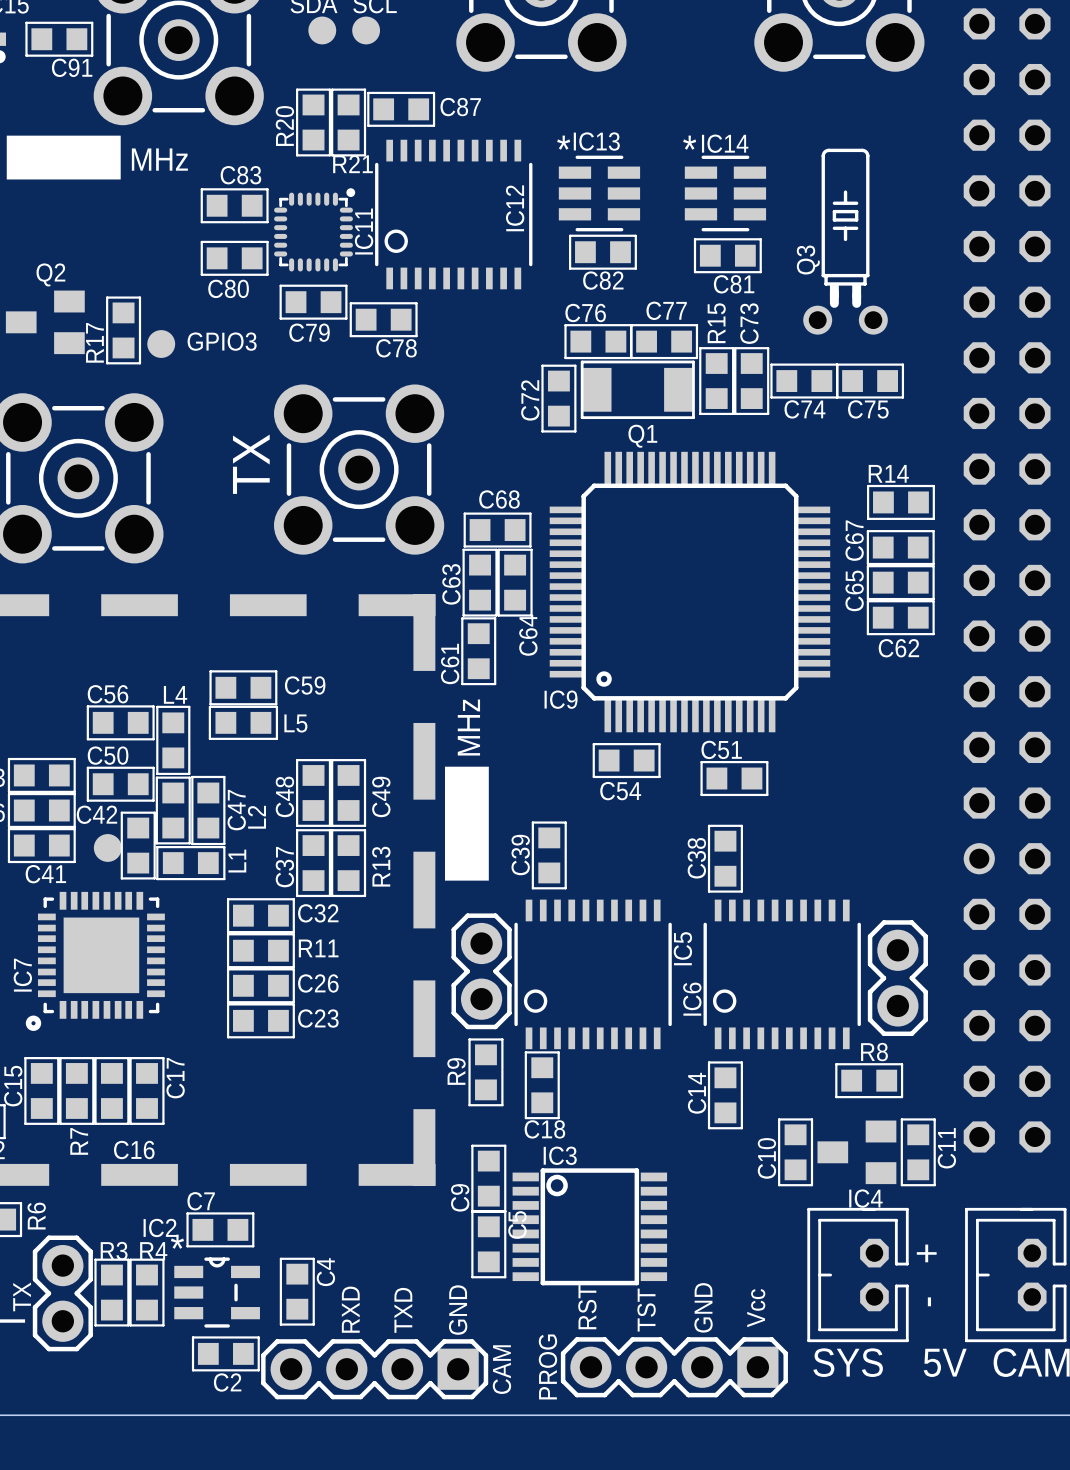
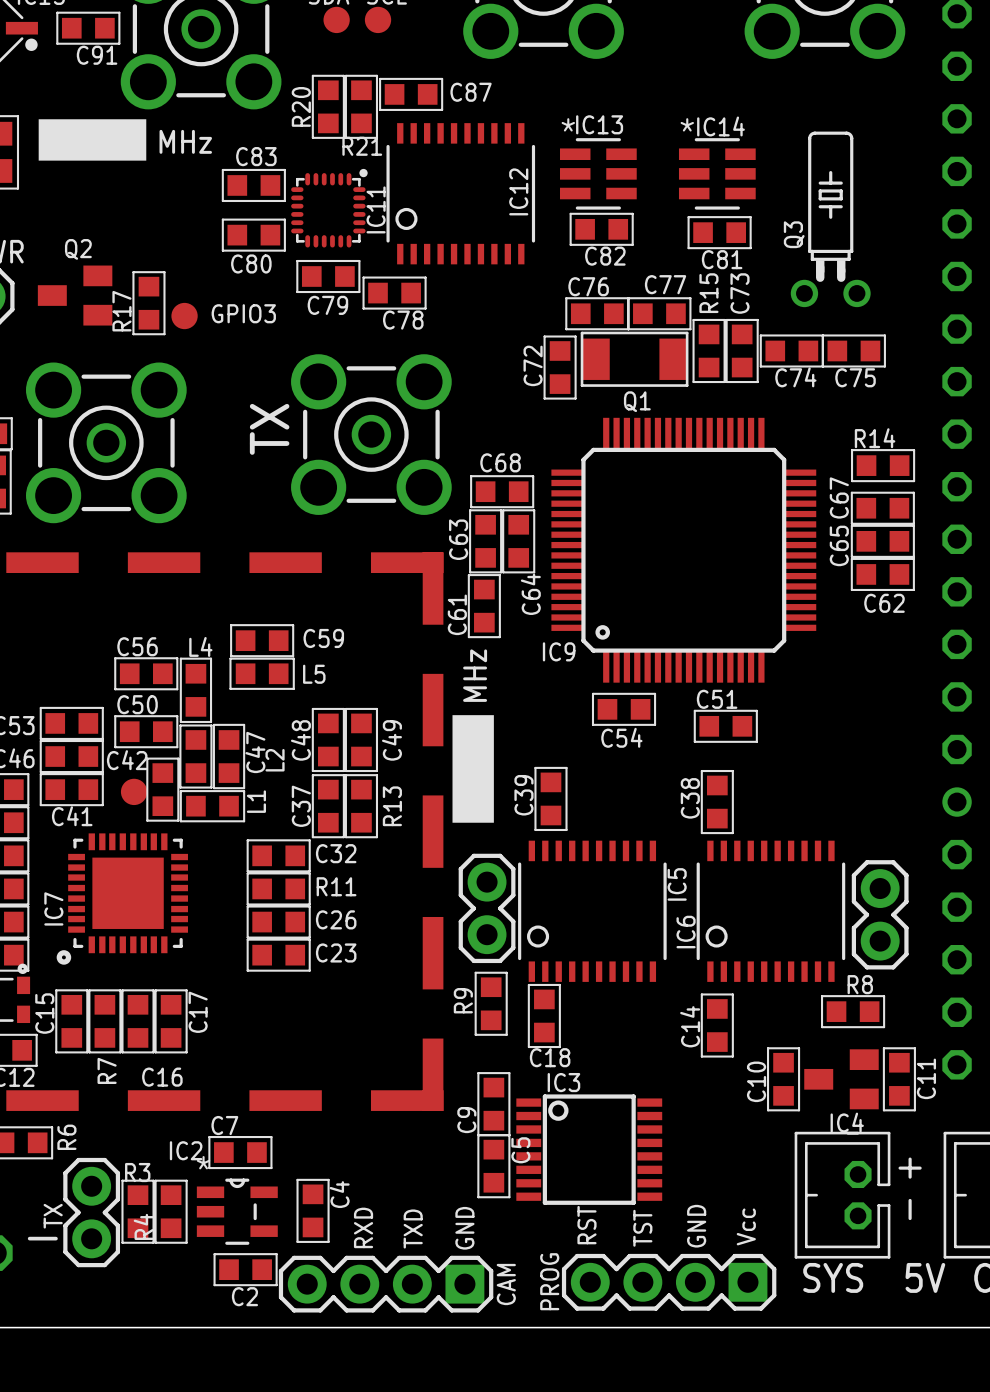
R4 name rotation: 0° (153, 1251) -> 90° counterclockwise (143, 1226)
R4 name position: R4 (153, 1251) -> R4 (143, 1226)

